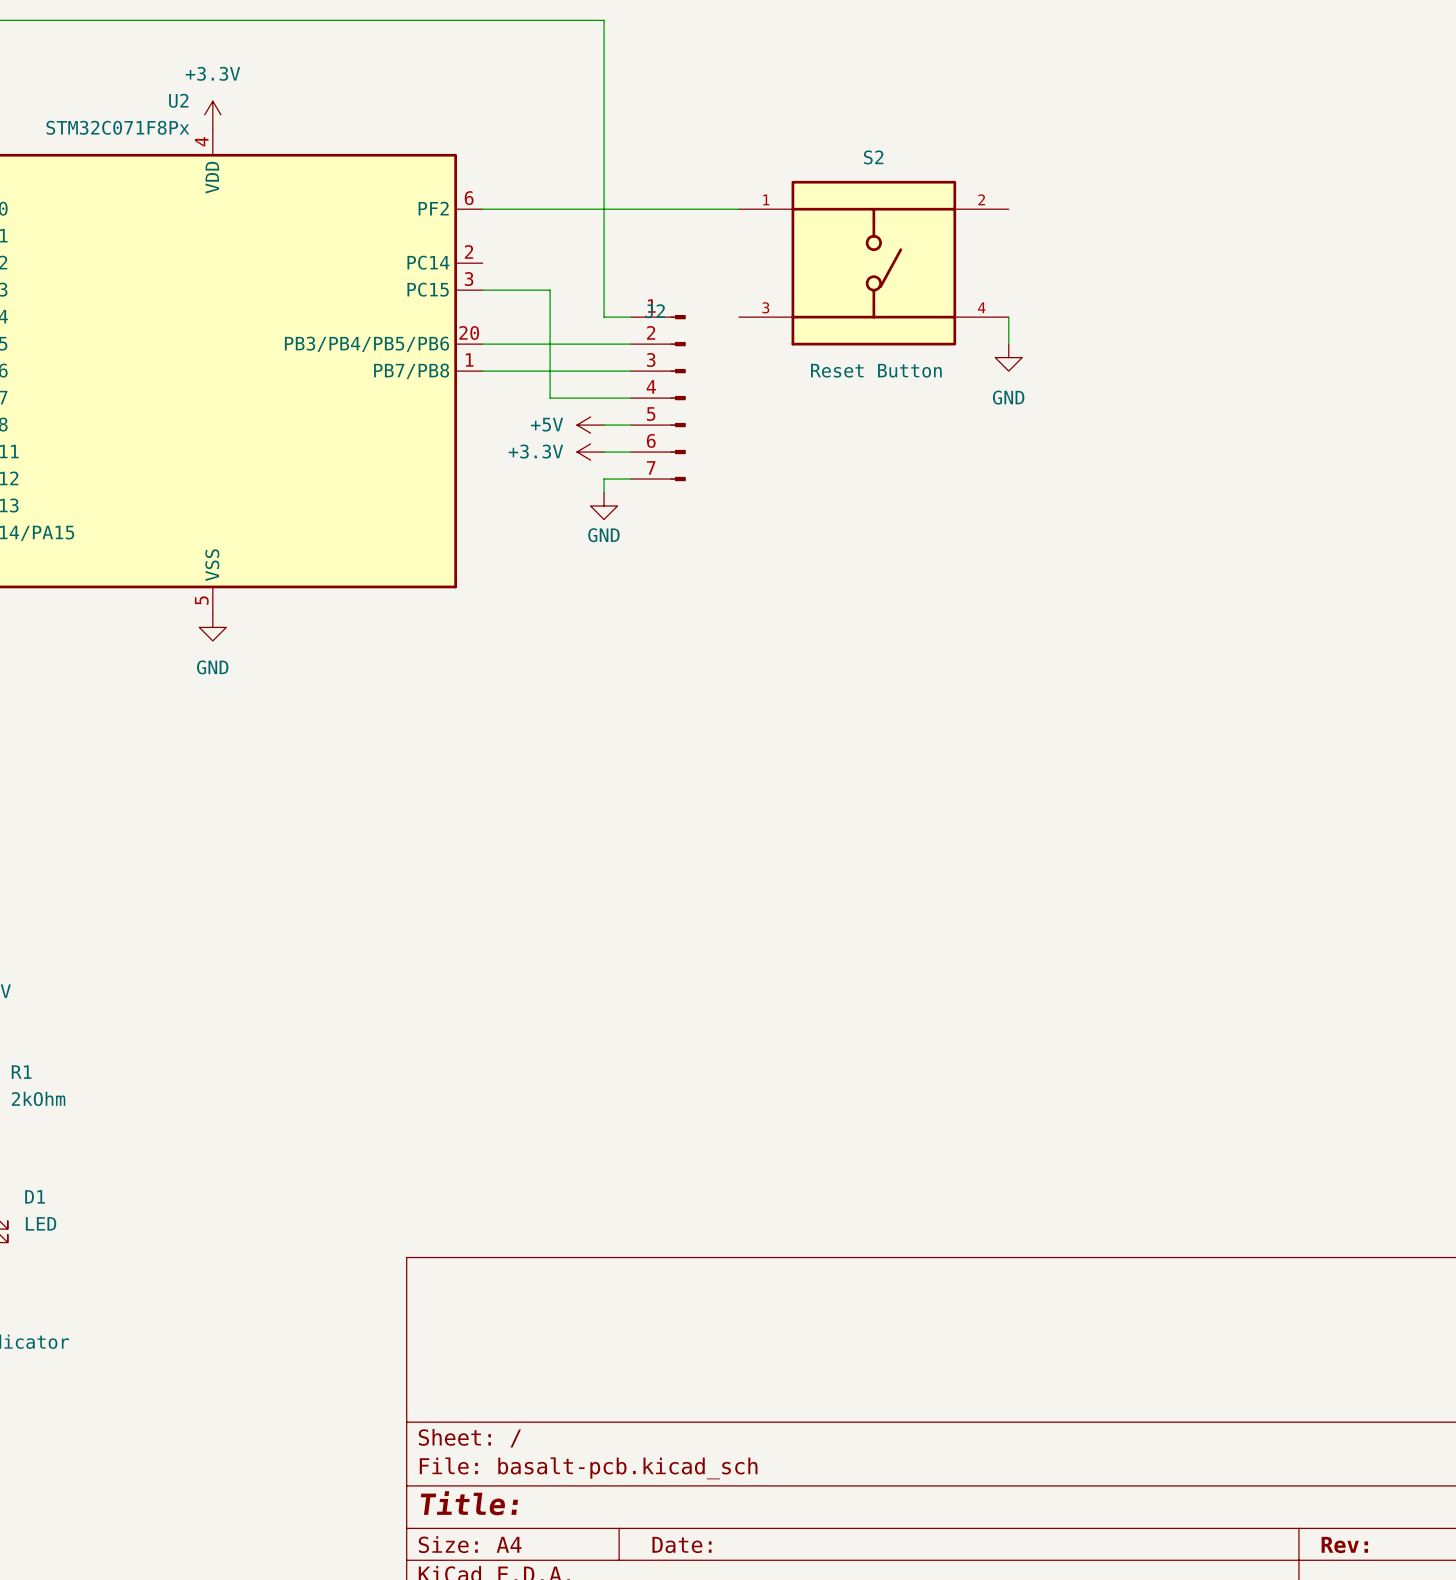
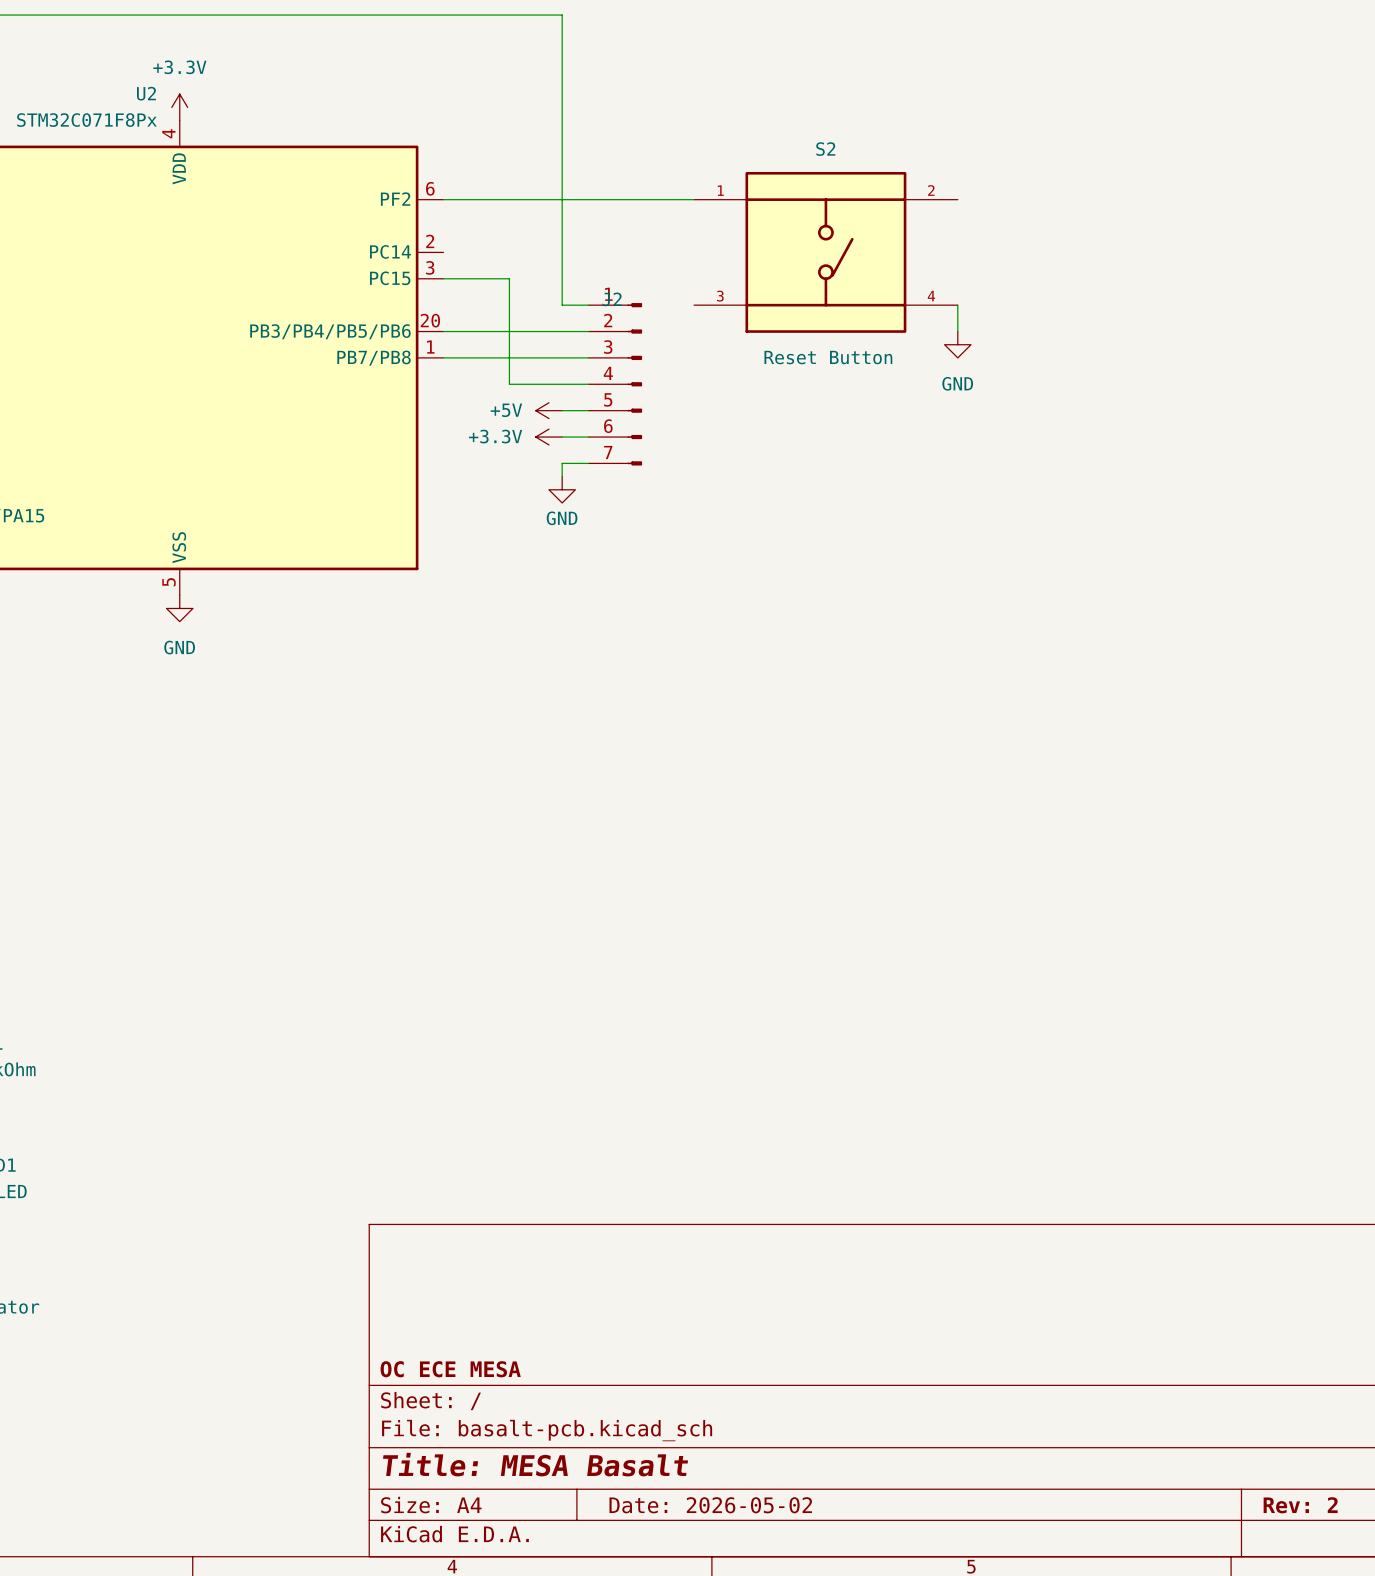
title block: none -> OC ECE MESA (450, 1369)
title block: Title: (469, 1503) -> Title: MESA Basalt (535, 1464)
title block: Date: (681, 1544) -> Date: 2026-05-02 (710, 1505)
title block: Rev: (1344, 1544) -> Rev: 2 (1300, 1505)

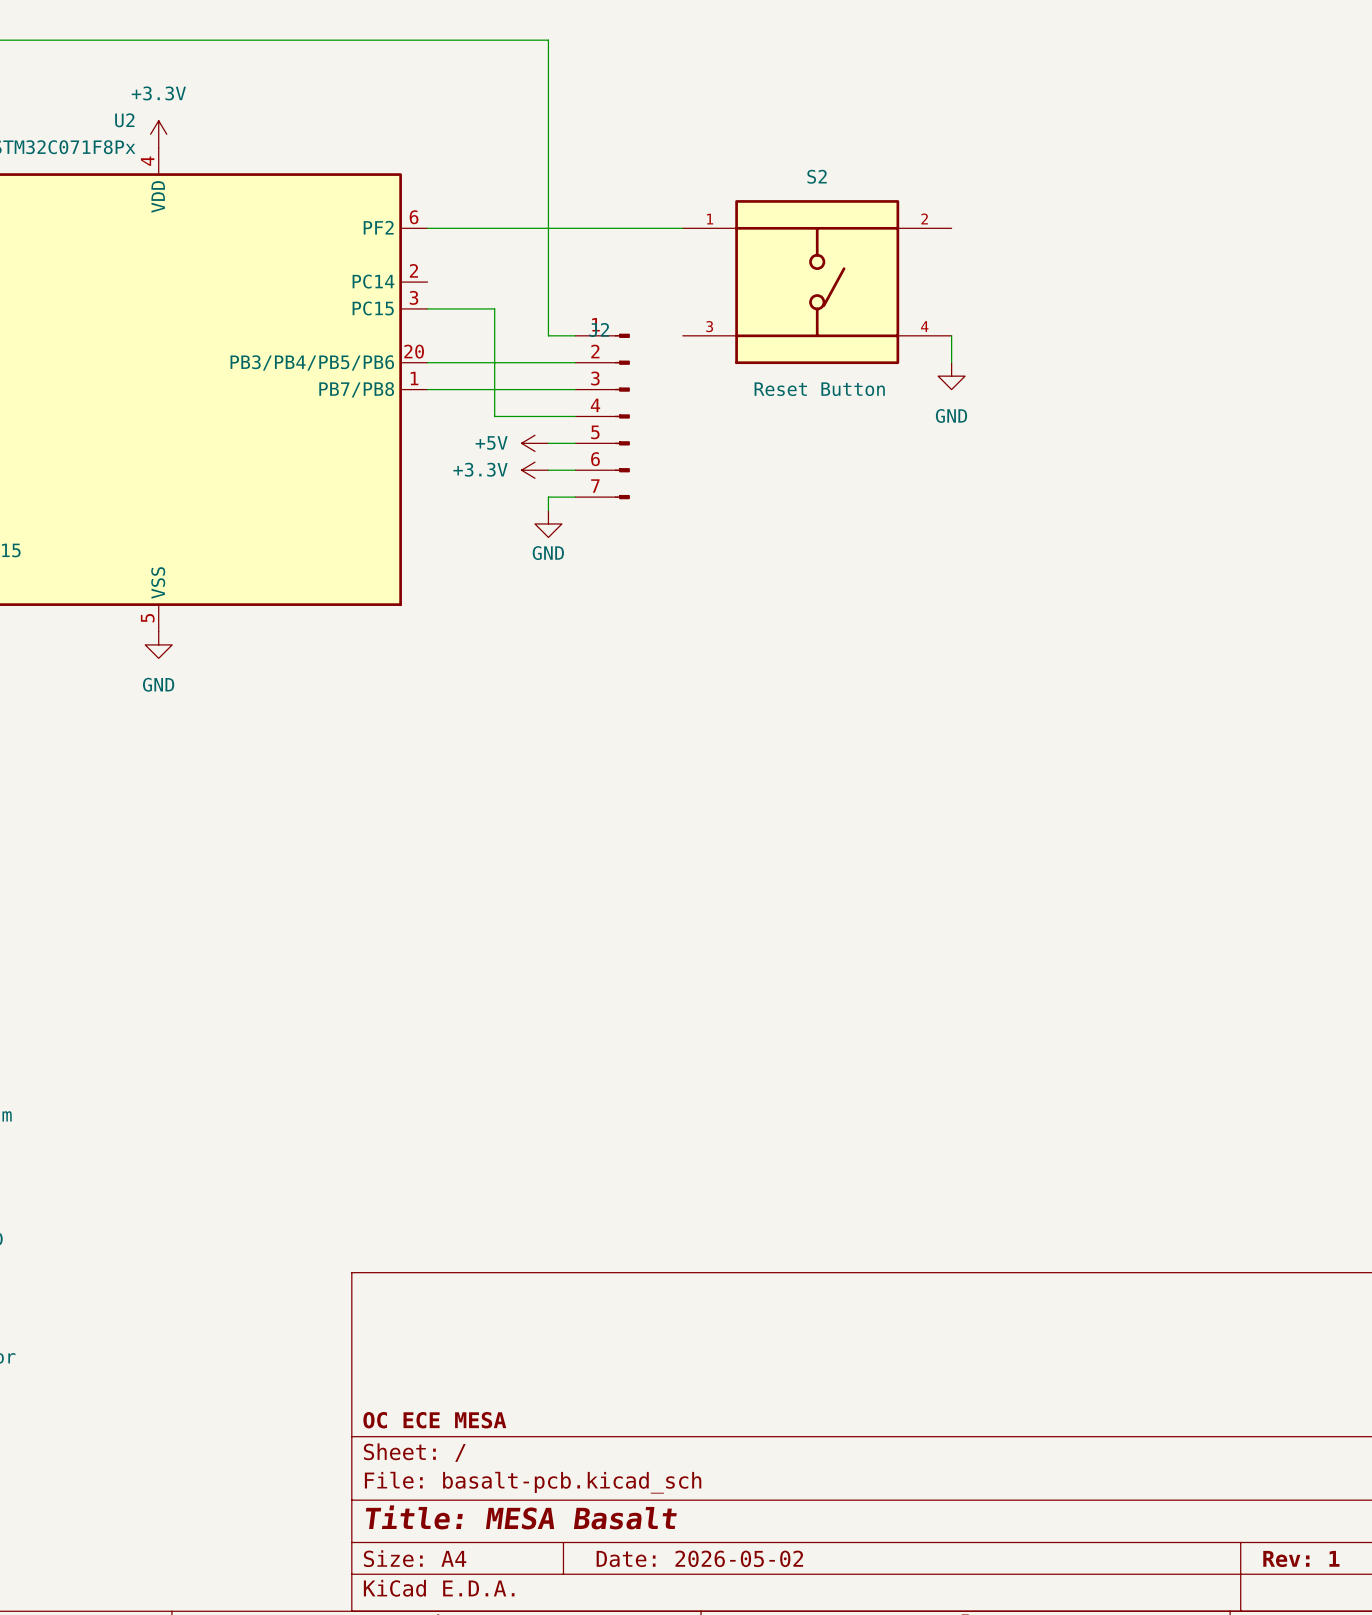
title block: Rev: 2 (1300, 1505) -> Rev: 1 (1301, 1558)

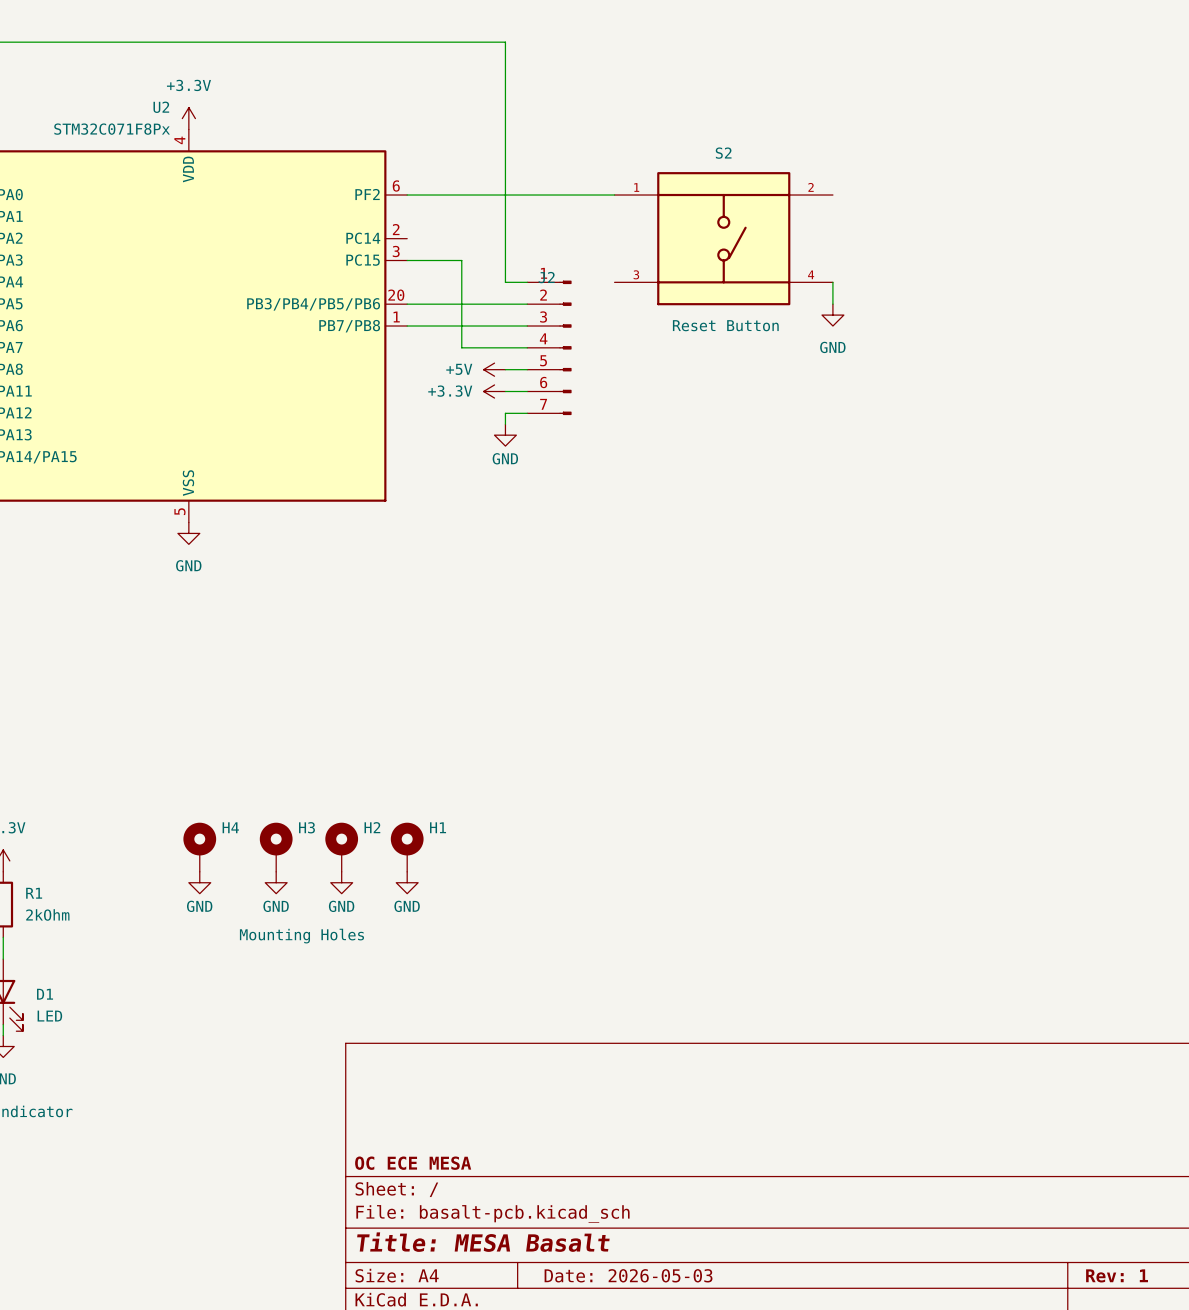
H4: none -> (199, 847)
H3: none -> (276, 847)
H2: none -> (341, 847)
H1: none -> (407, 847)
power symbol: none -> GND (199, 882)
power symbol: none -> GND (276, 882)
power symbol: none -> GND (341, 882)
power symbol: none -> GND (407, 882)
title block: Date: 2026-05-02 (699, 1558) -> Date: 2026-05-03 (628, 1275)

